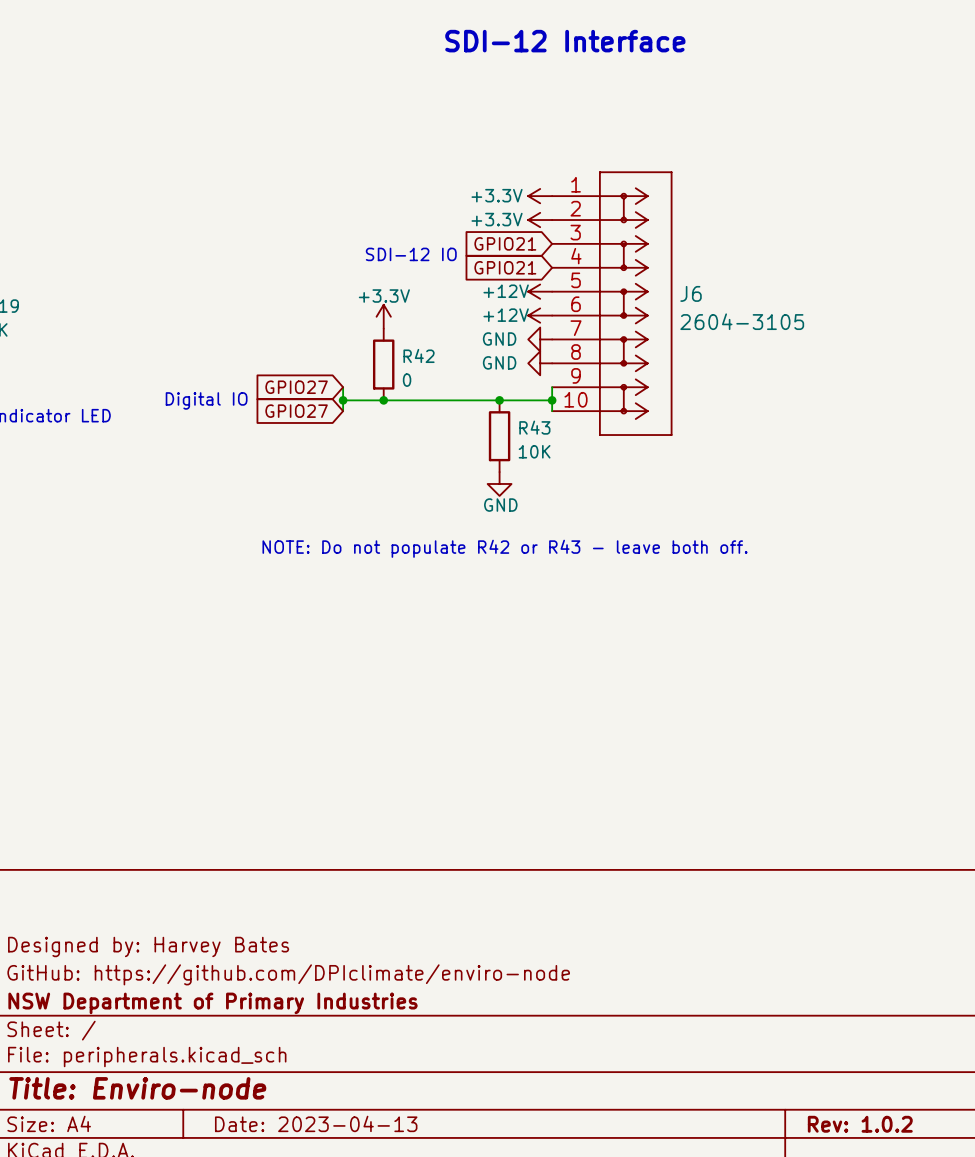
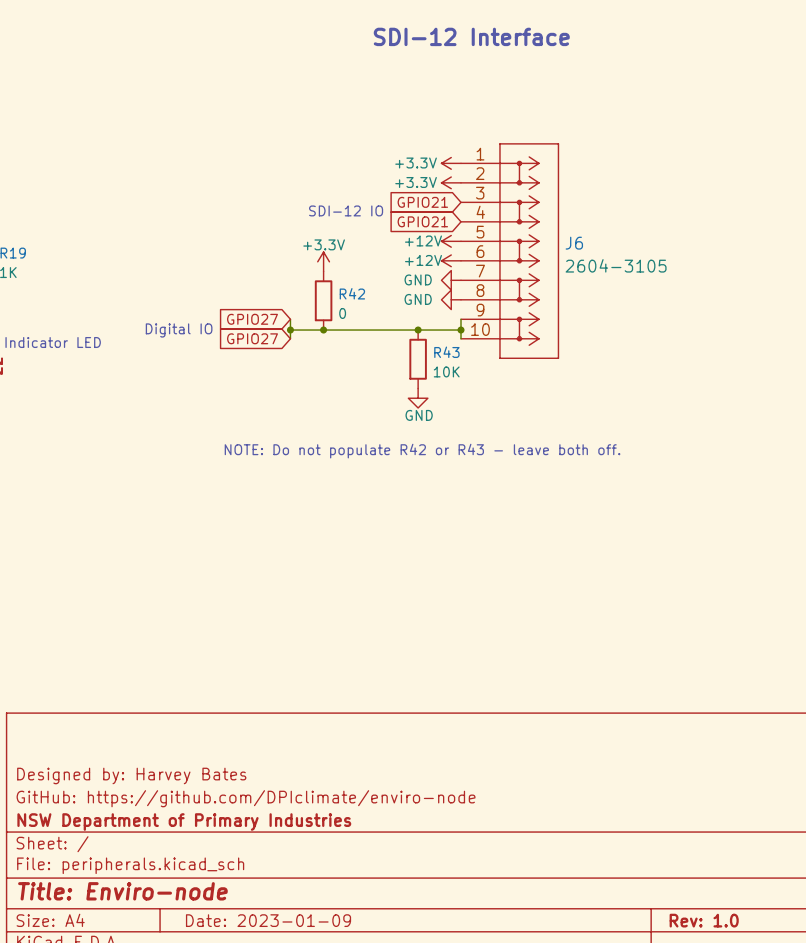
title block: Date: 2023-04-13 (316, 1123) -> Date: 2023-01-09 (268, 920)
title block: Rev: 1.0.2 (860, 1124) -> Rev: 1.0 (704, 920)

